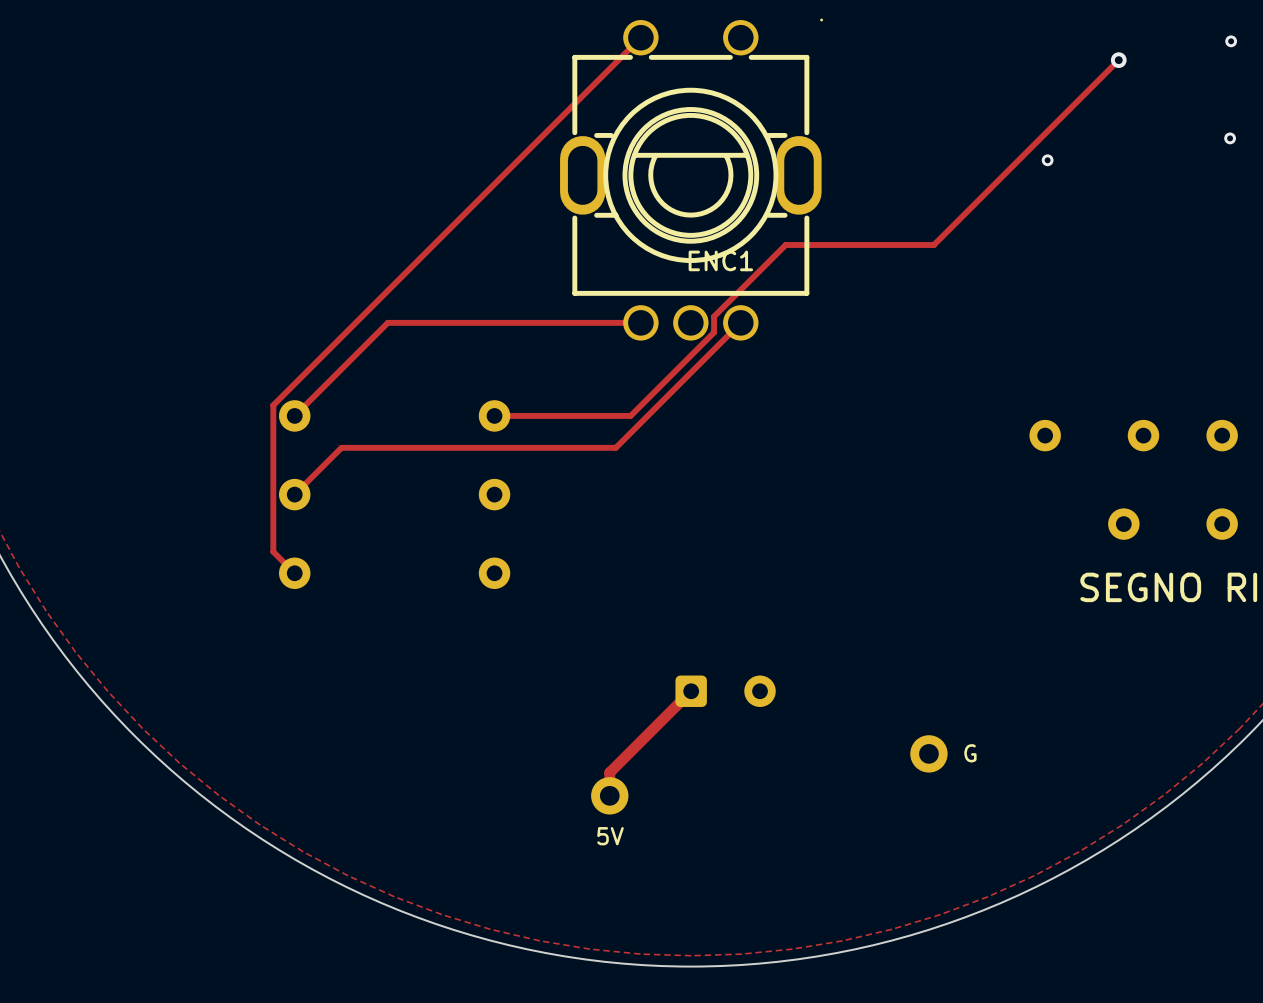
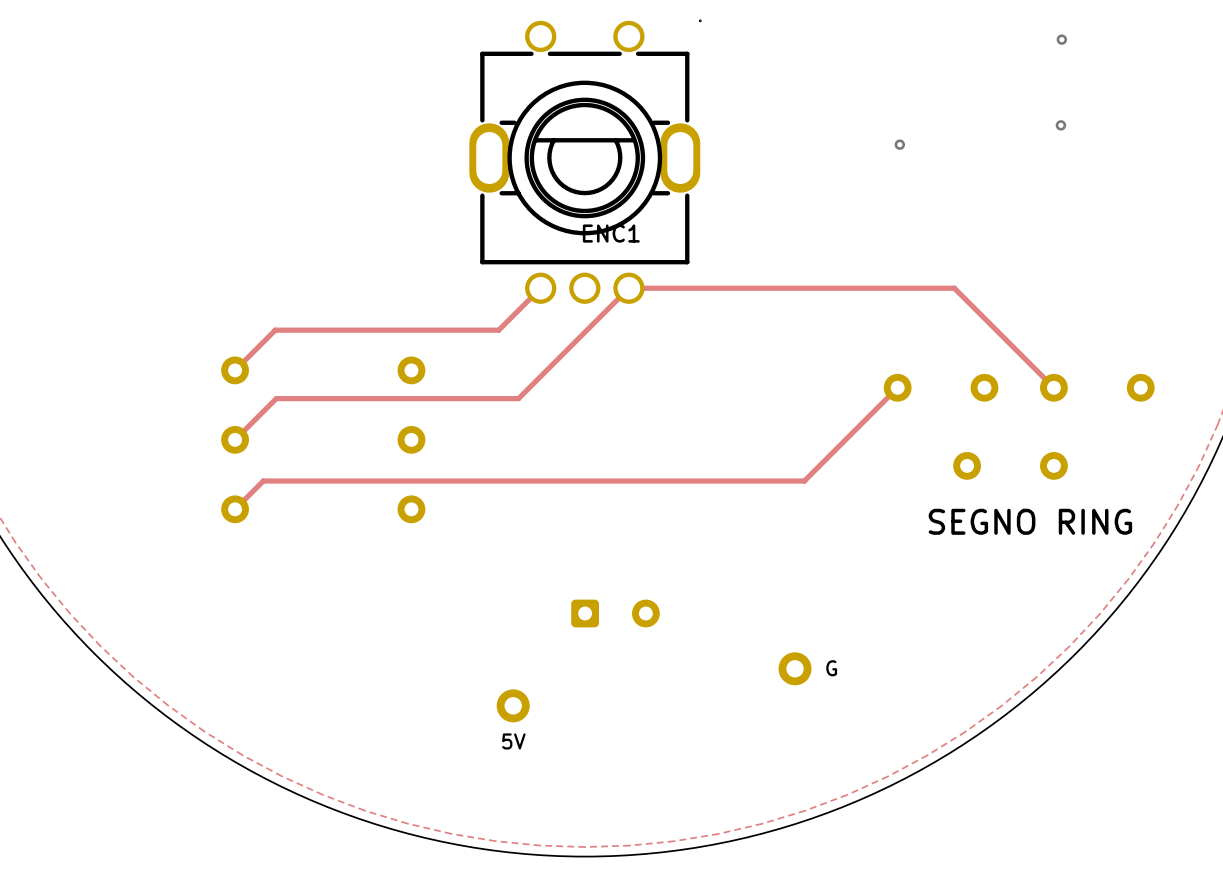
track: (640, 37) (273, 405) (273, 551) (294, 573) -> (897, 387) (804, 481) (263, 481) (235, 509)
track: (1118, 60) (933, 244) (785, 244) (714, 316) (714, 332) (630, 415) (494, 415) -> none
via: (1118, 60) -> none
track: (640, 322) (387, 322) (340, 370) -> (540, 288) (498, 330) (275, 330)
track: none -> (628, 288) (954, 288) (1053, 387)
track: (691, 691) (609, 772) (609, 795) -> none

